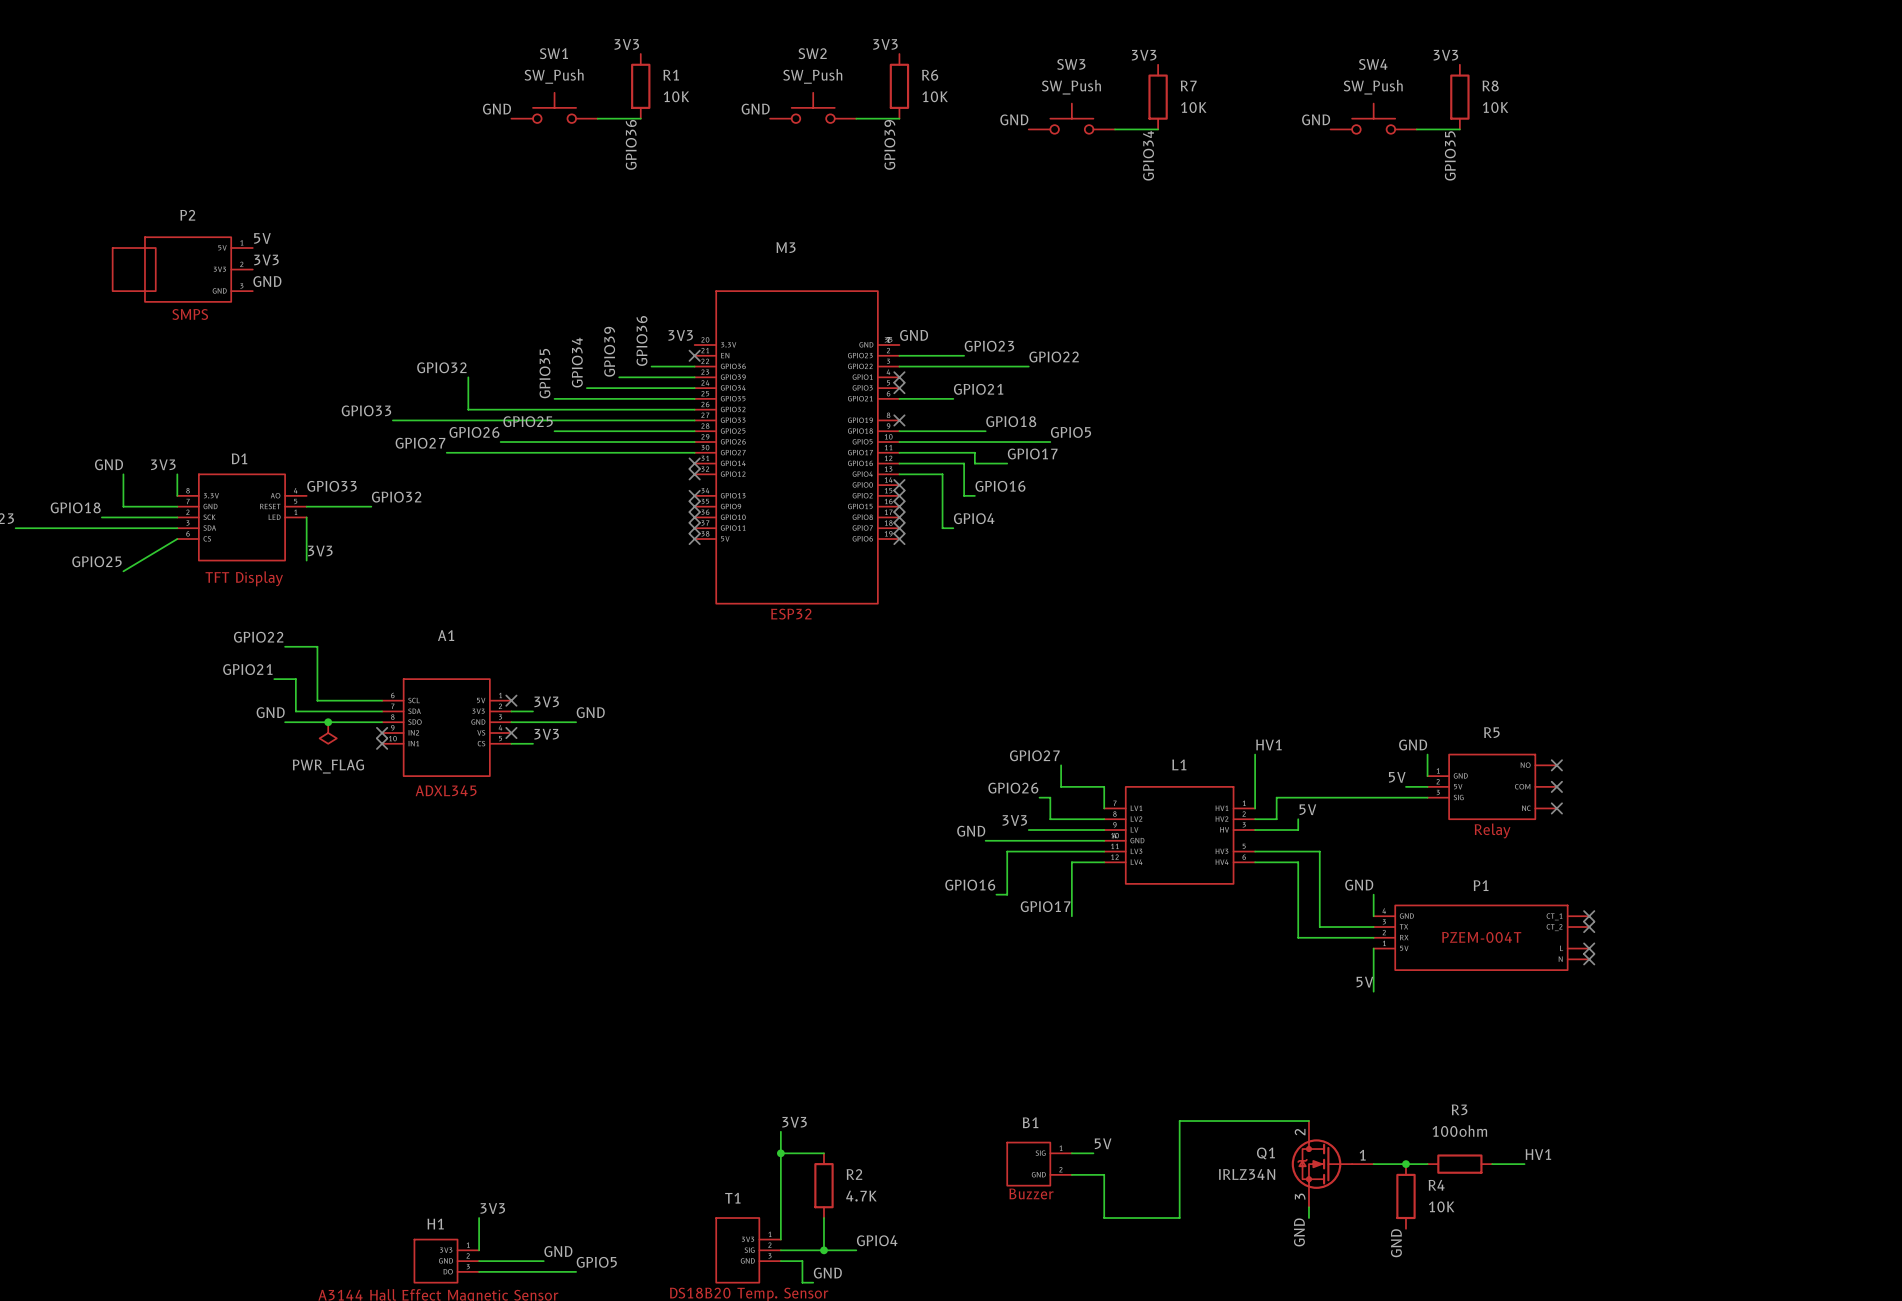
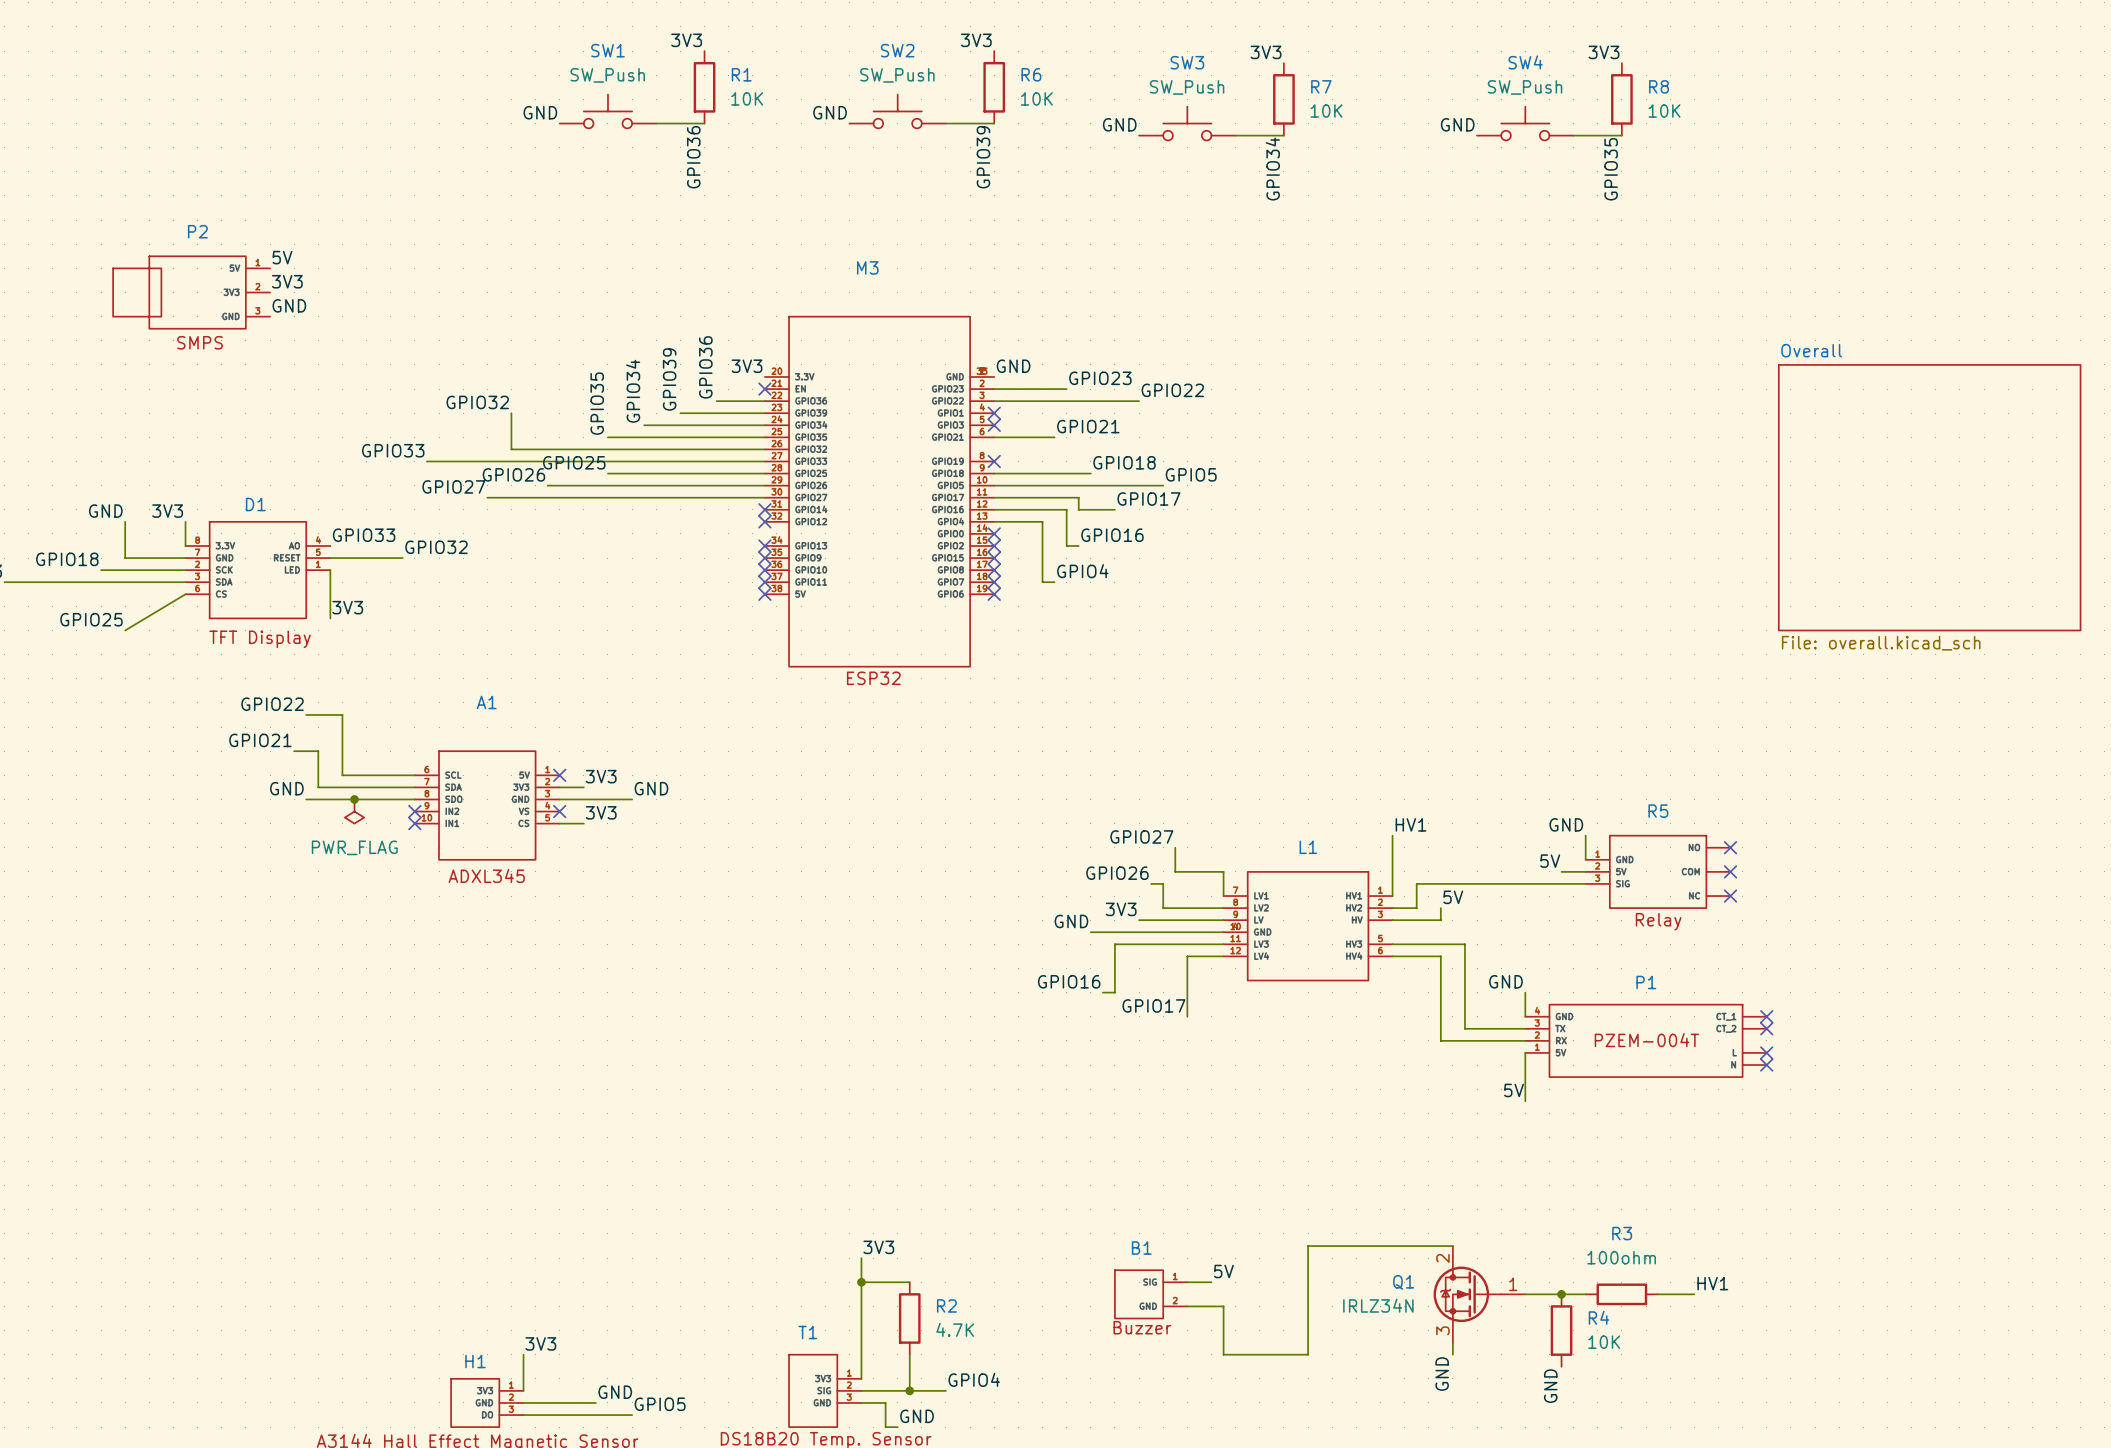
sheet Overall: none -> File: overall.kicad_sch (1929, 497)

